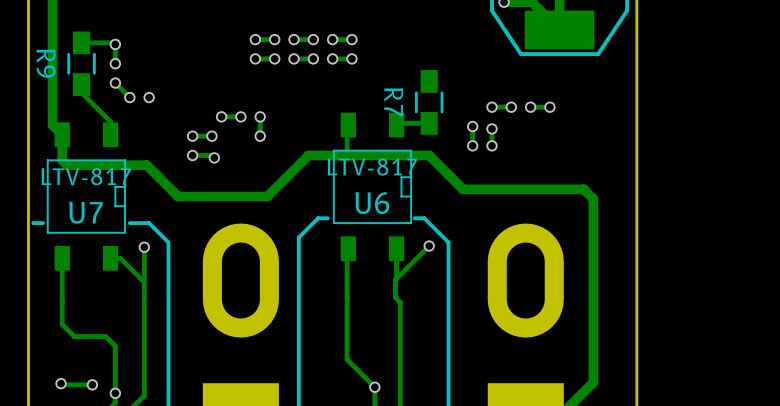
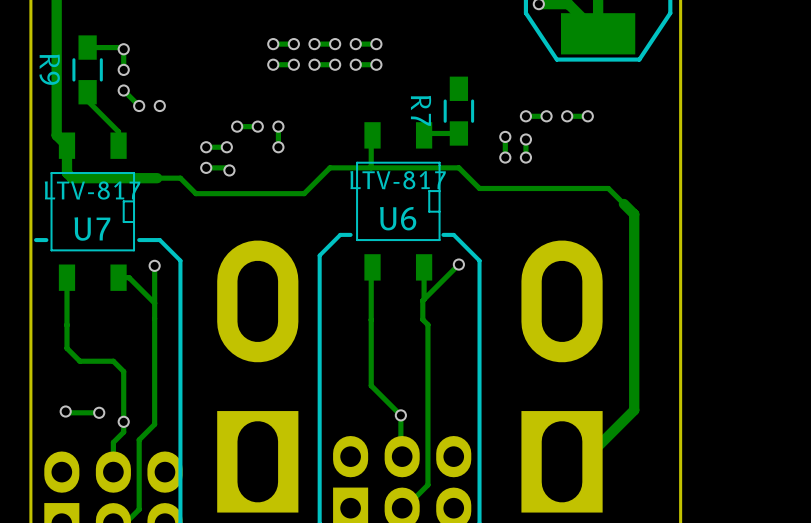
track: (146, 165) (178, 196) (267, 196) (308, 155) (429, 155) (463, 189) (583, 189) -> (157, 178) (180, 178) (195, 193) (304, 193)
track: none -> (479, 188) (608, 188) (623, 203)

